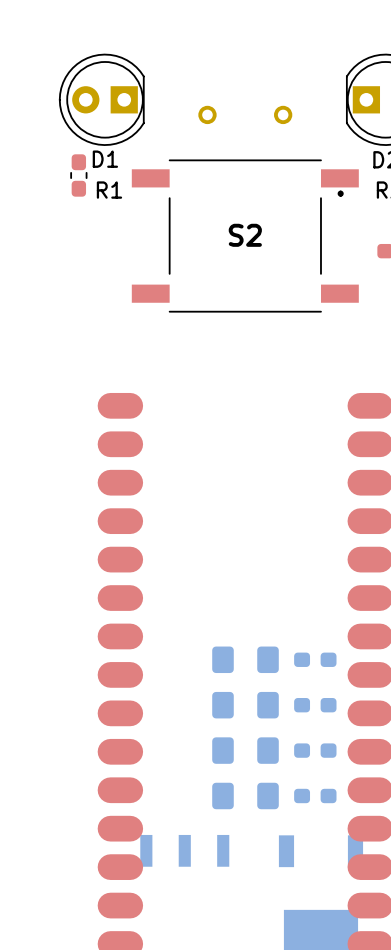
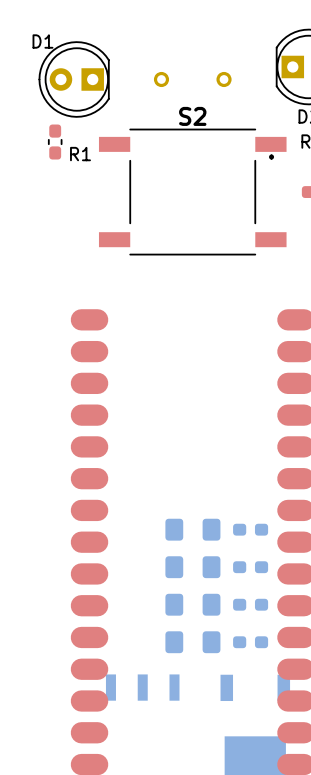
D1 position: (101, 99) -> (74, 79)
D1 name position: D1 (105, 159) -> D1 (42, 41)
R1 position: (78, 175) -> (55, 142)
S2 name position: S2 (245, 235) -> S2 (192, 116)
S2 position: (245, 236) -> (192, 192)

